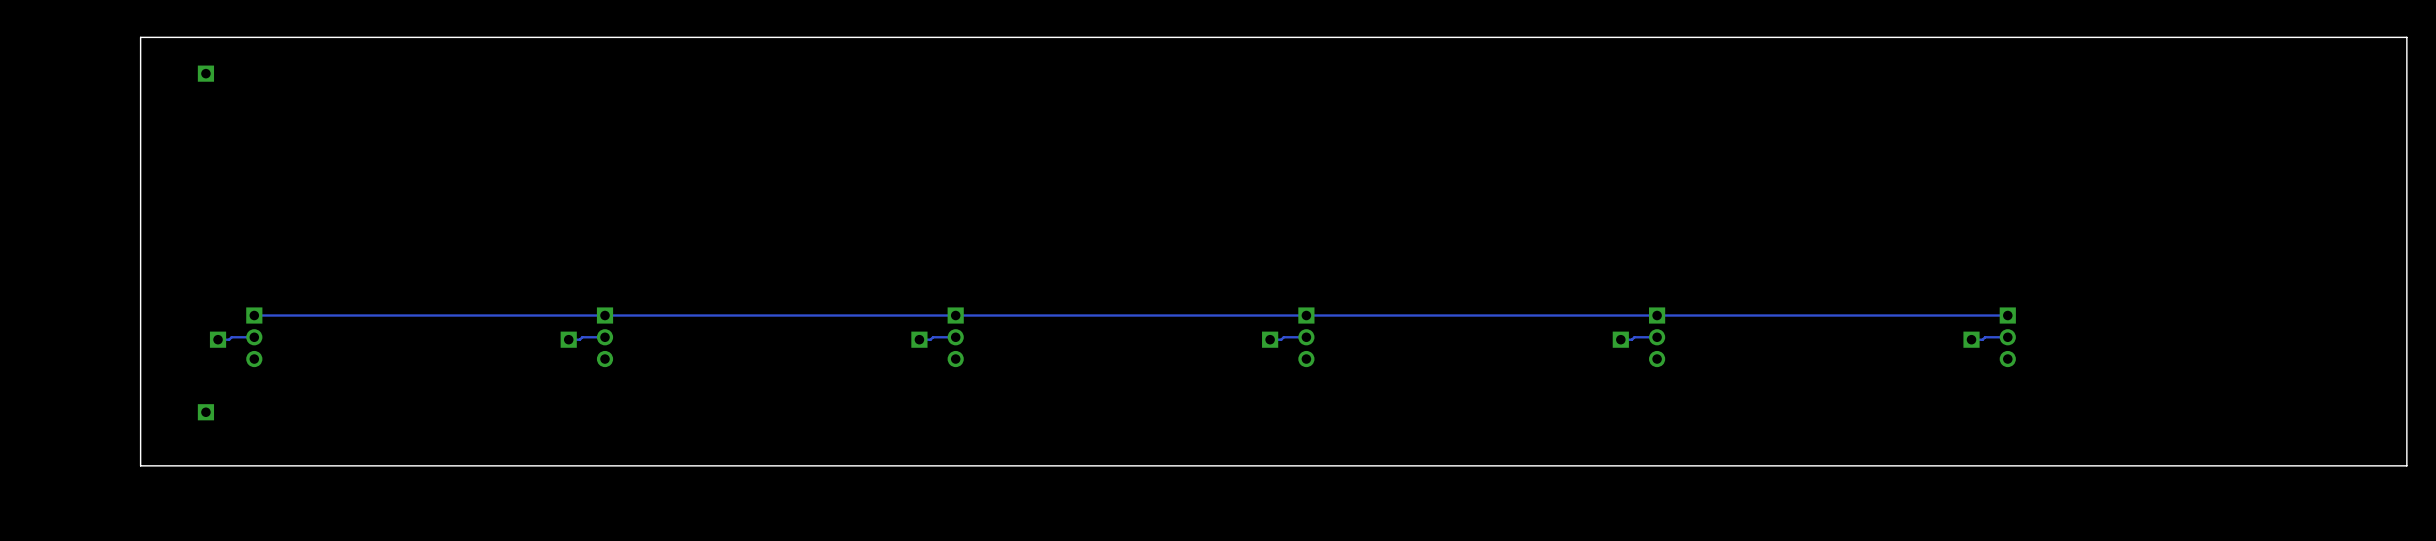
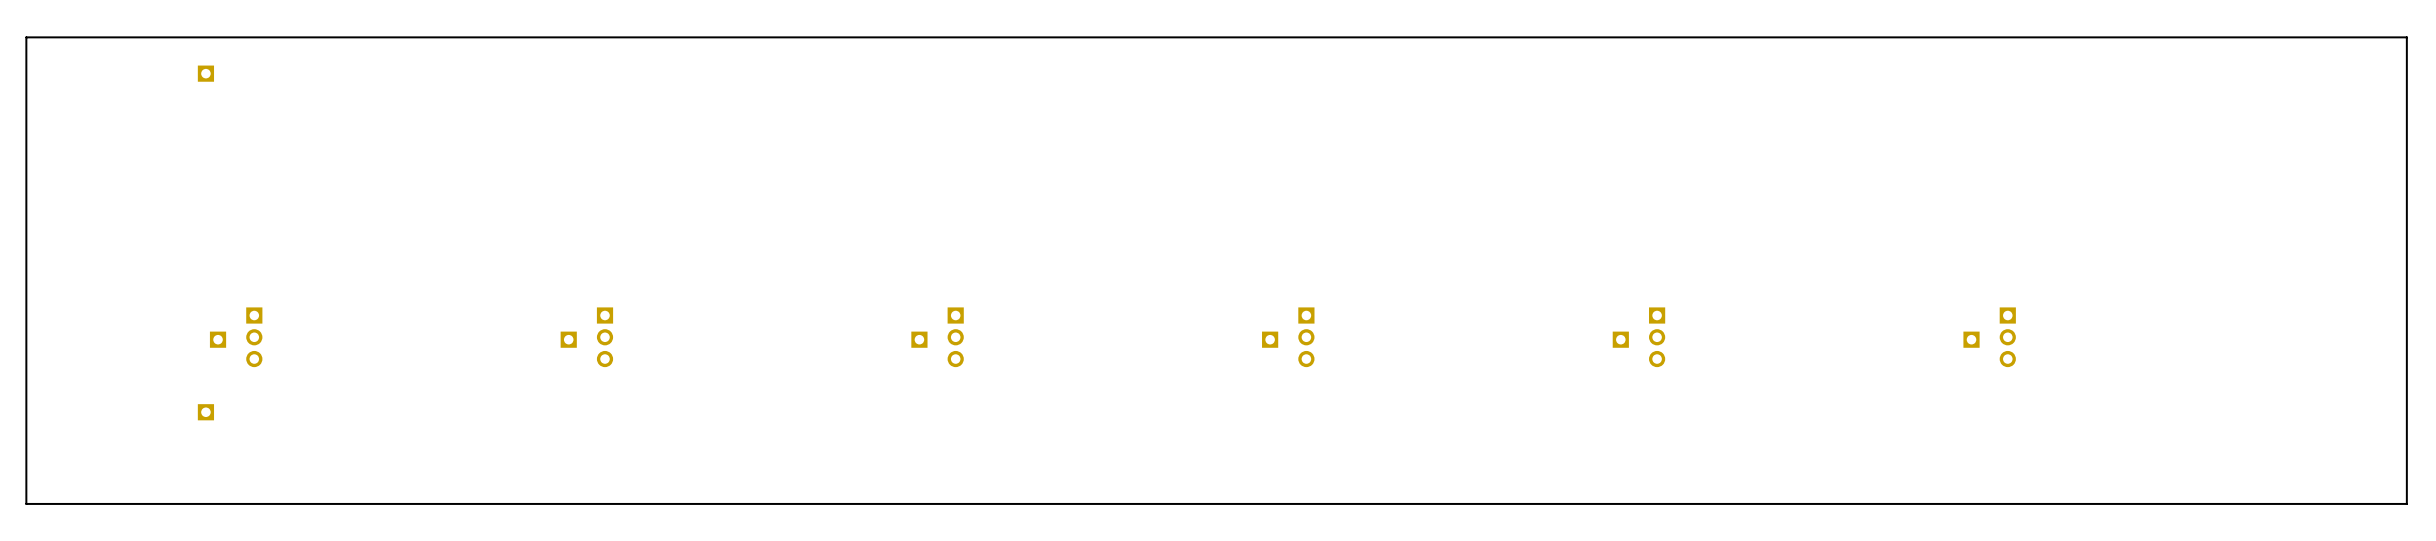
board edge: (140, 37) (140, 465) (2406, 465) -> (140, 37) (26, 37) (26, 503) (2406, 503) (2406, 465)
track: (2007, 315) (254, 315) -> none
track: (254, 337) (231, 337) (229, 339) (218, 339) -> none
track: (605, 337) (582, 337) (579, 339) (568, 339) -> none
track: (955, 337) (933, 337) (930, 339) (919, 339) -> none
track: (1306, 337) (1283, 337) (1281, 339) (1270, 339) -> none
track: (1657, 337) (1634, 337) (1632, 339) (1620, 339) -> none
track: (2007, 337) (1985, 337) (1982, 339) (1971, 339) -> none

